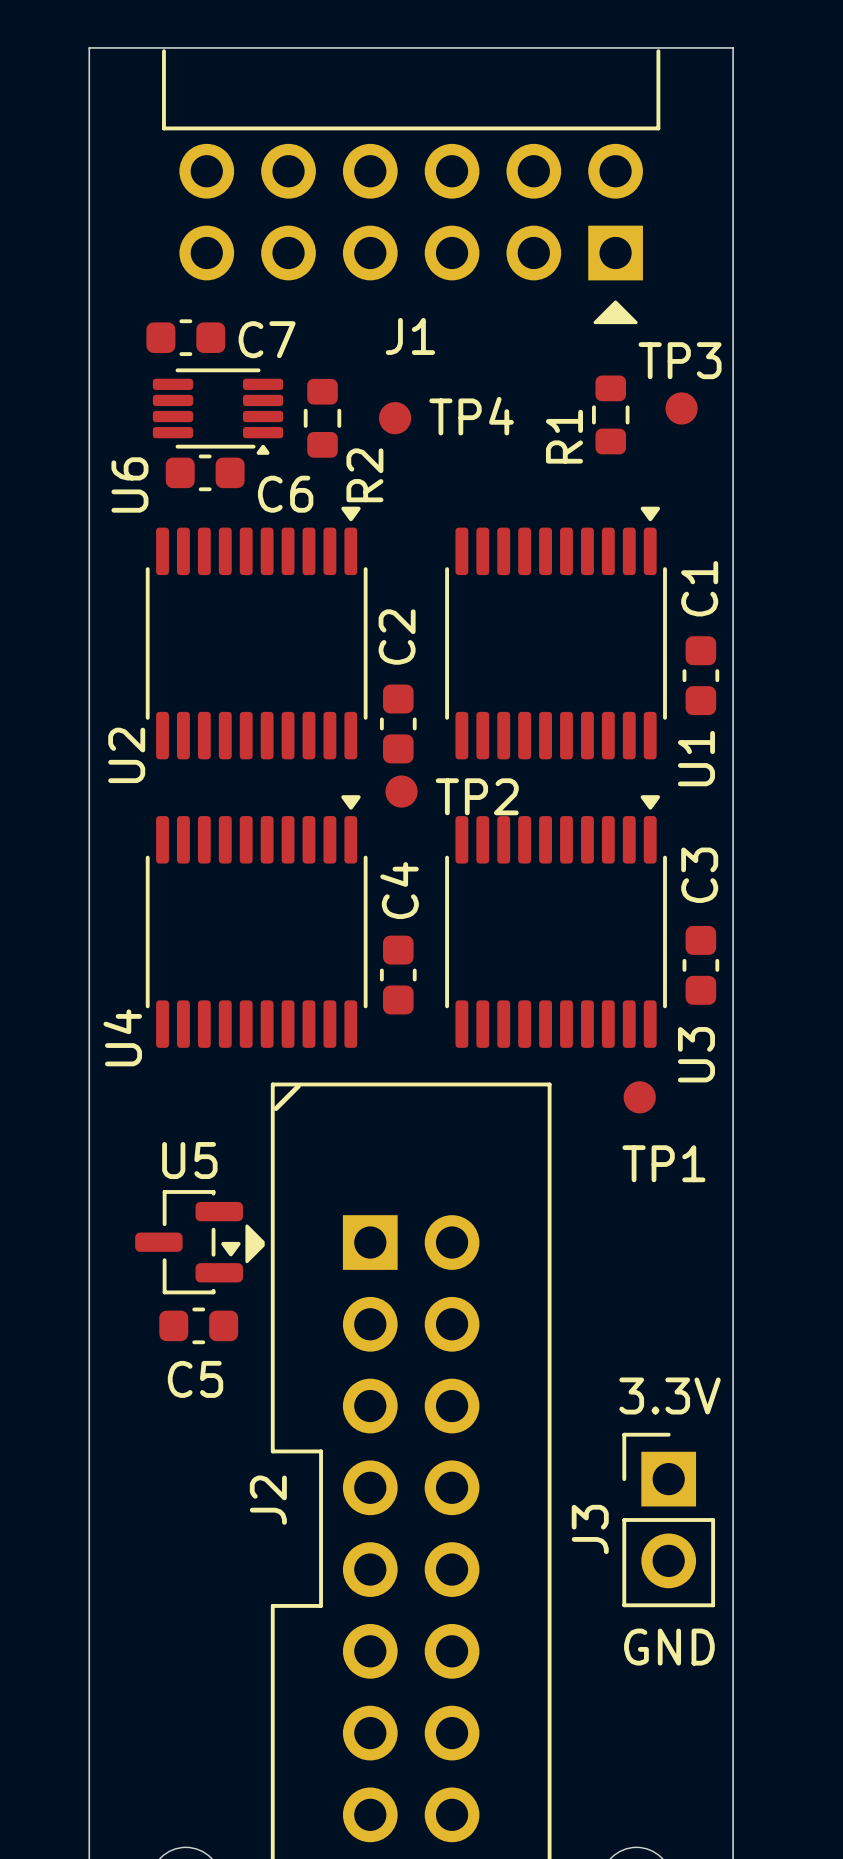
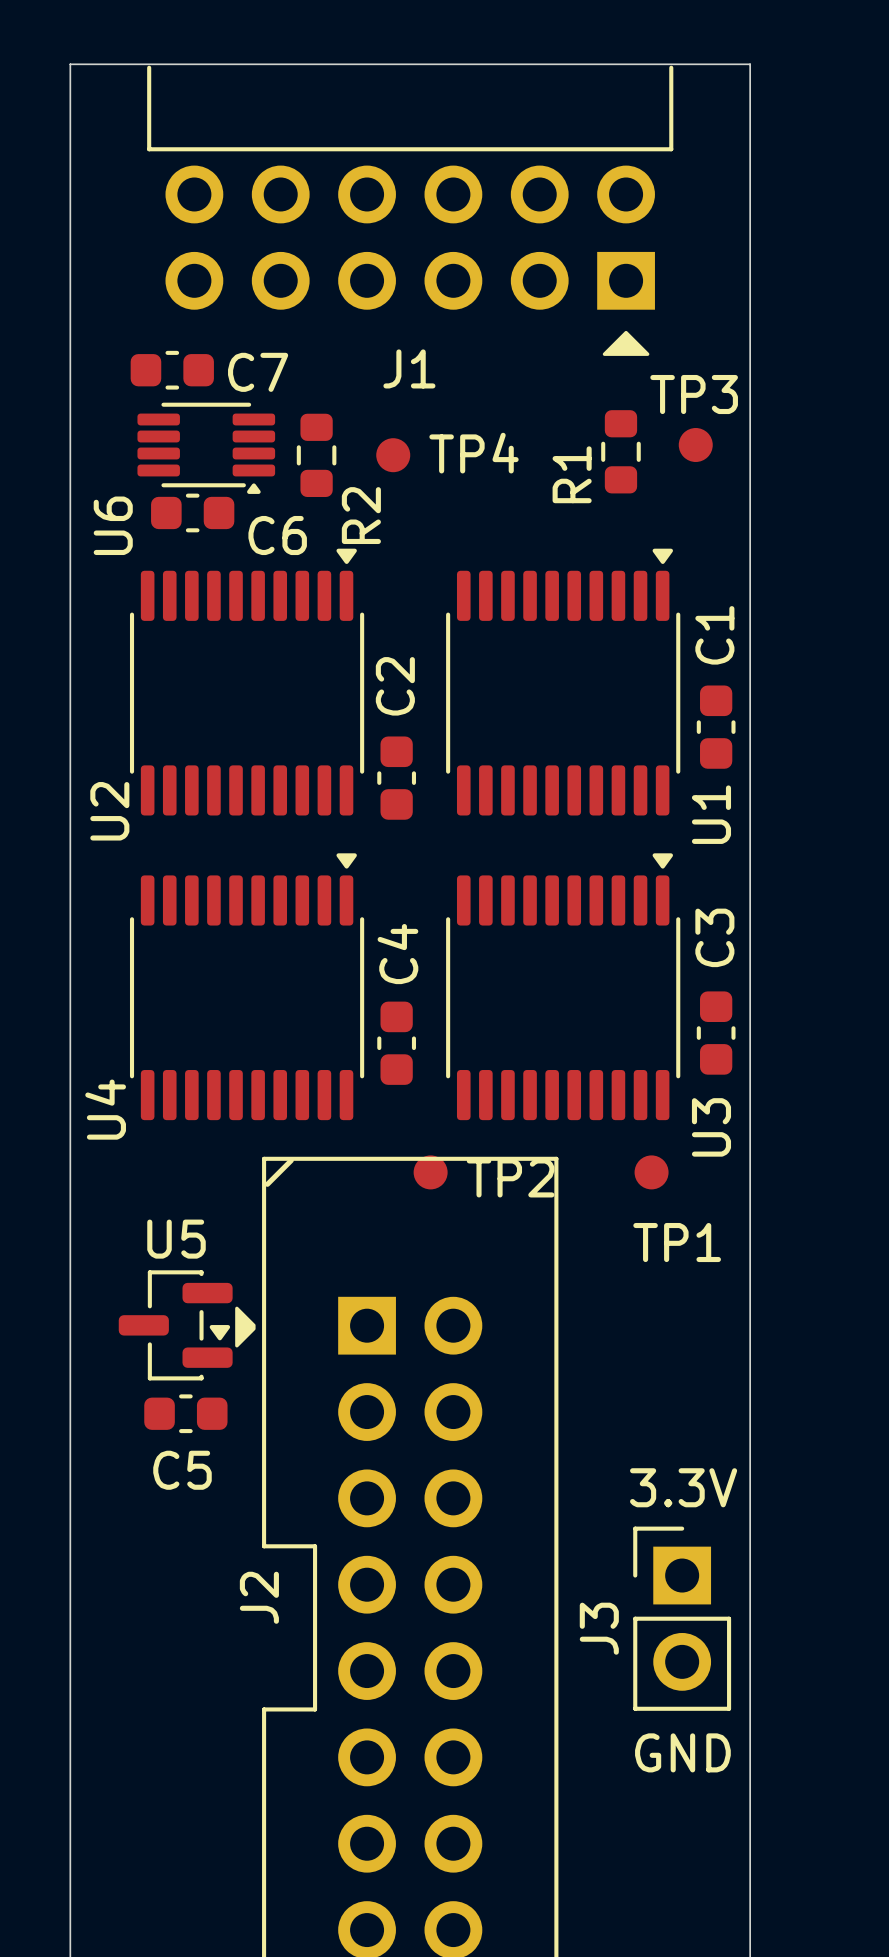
TP2 position: (401, 791) -> (430, 1172)

